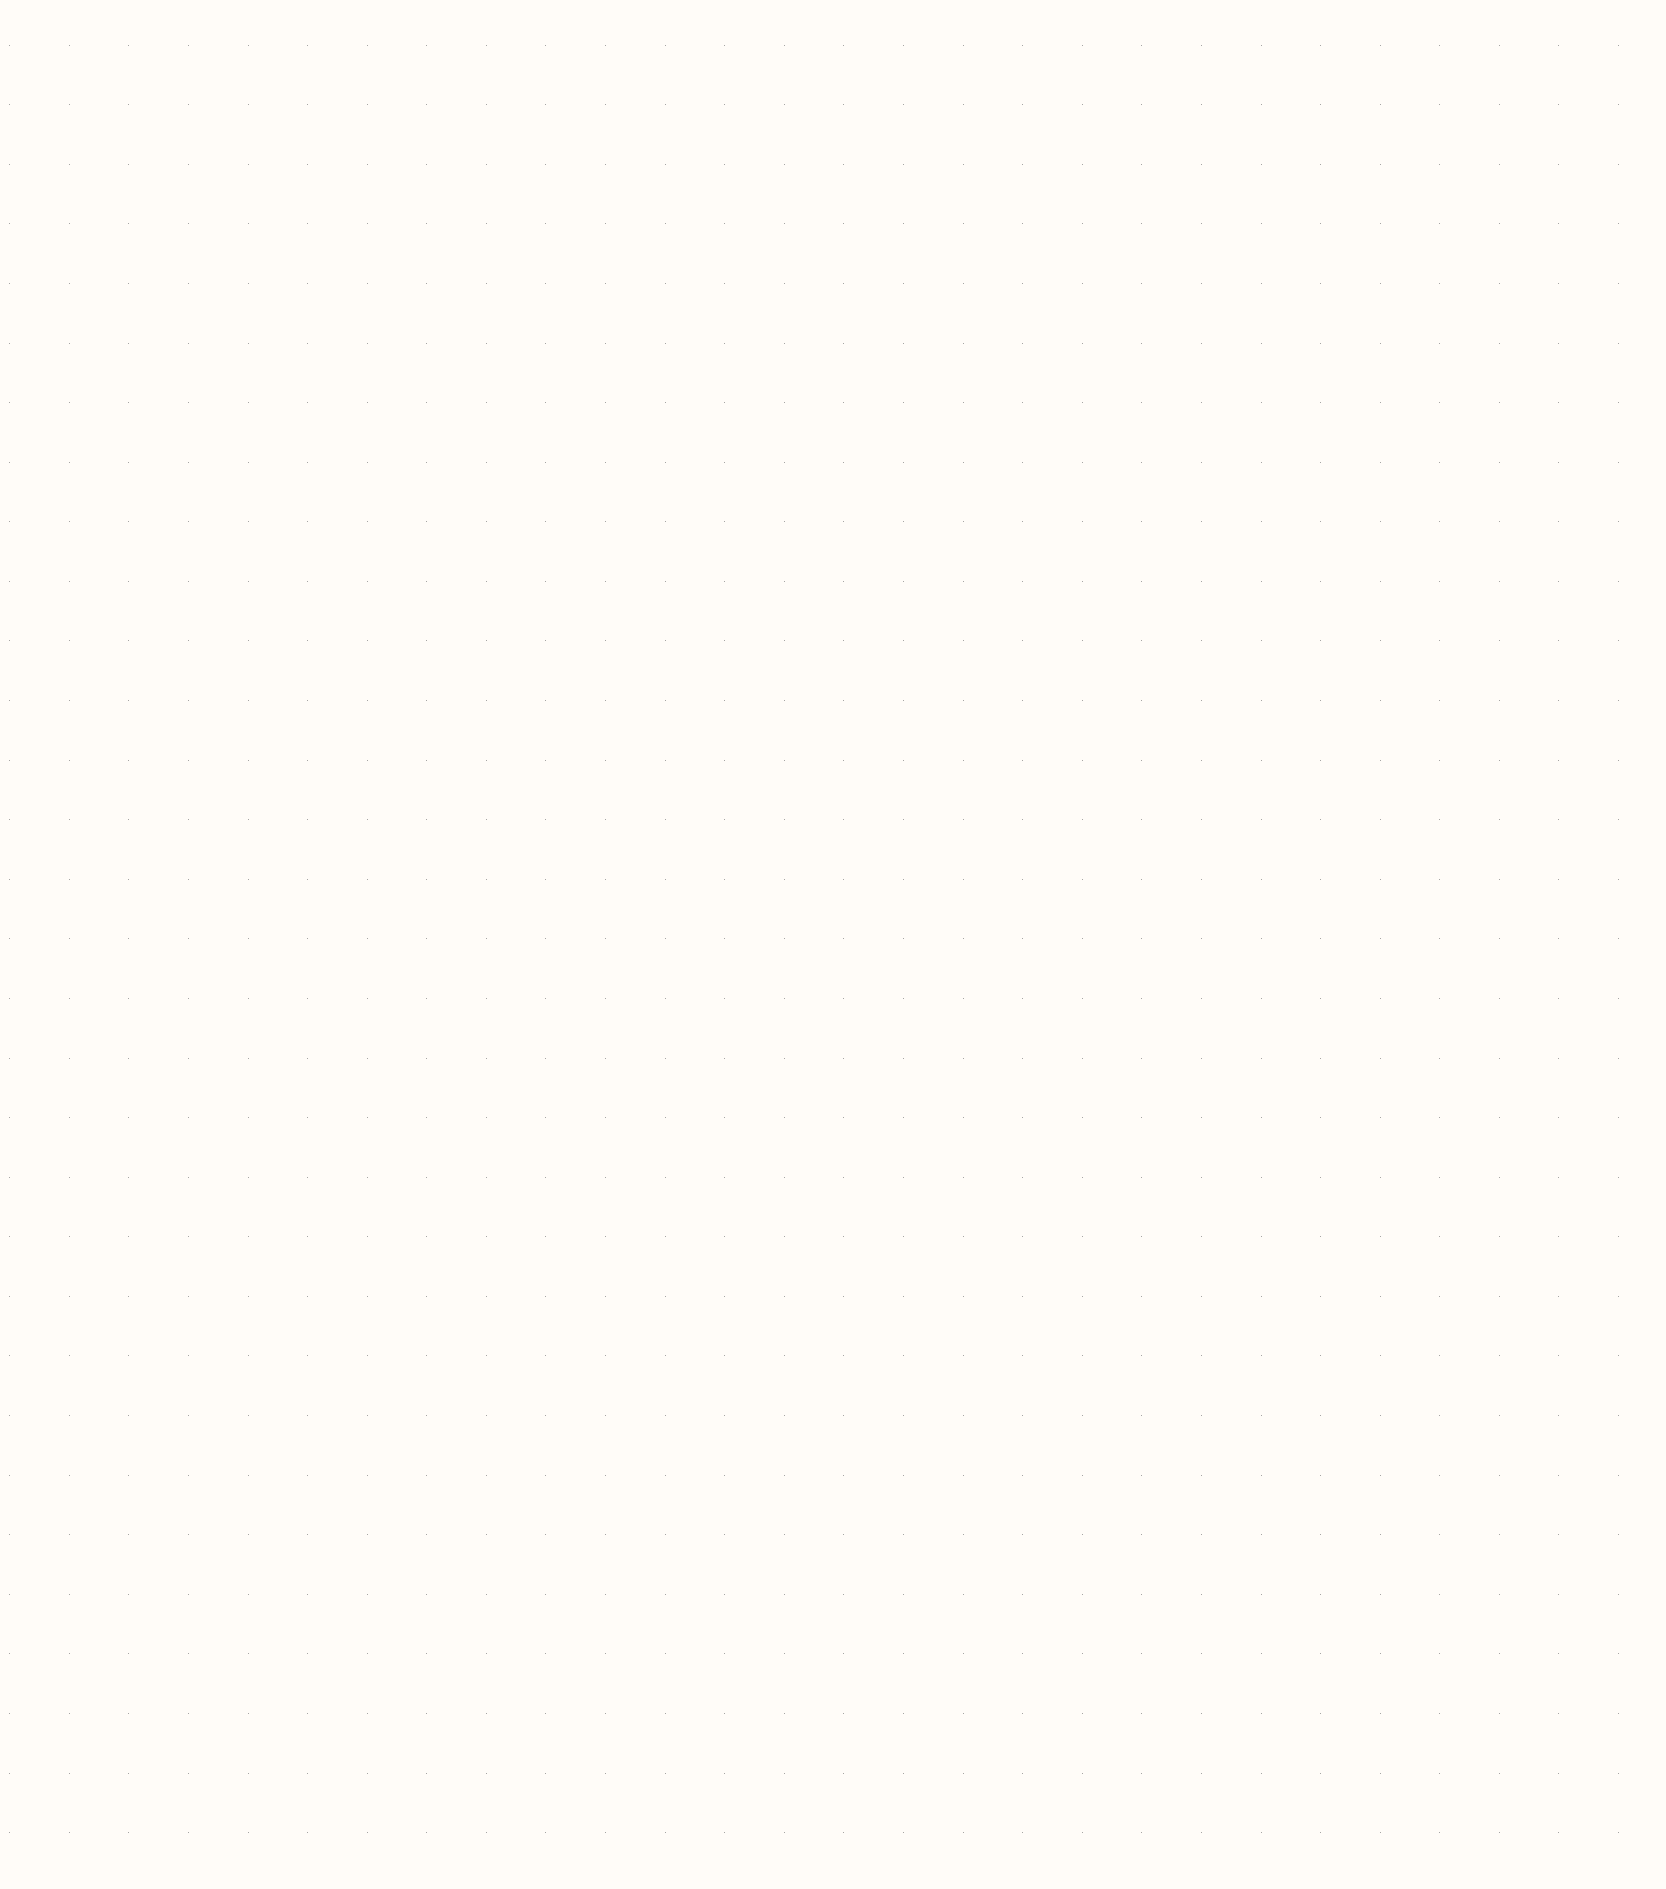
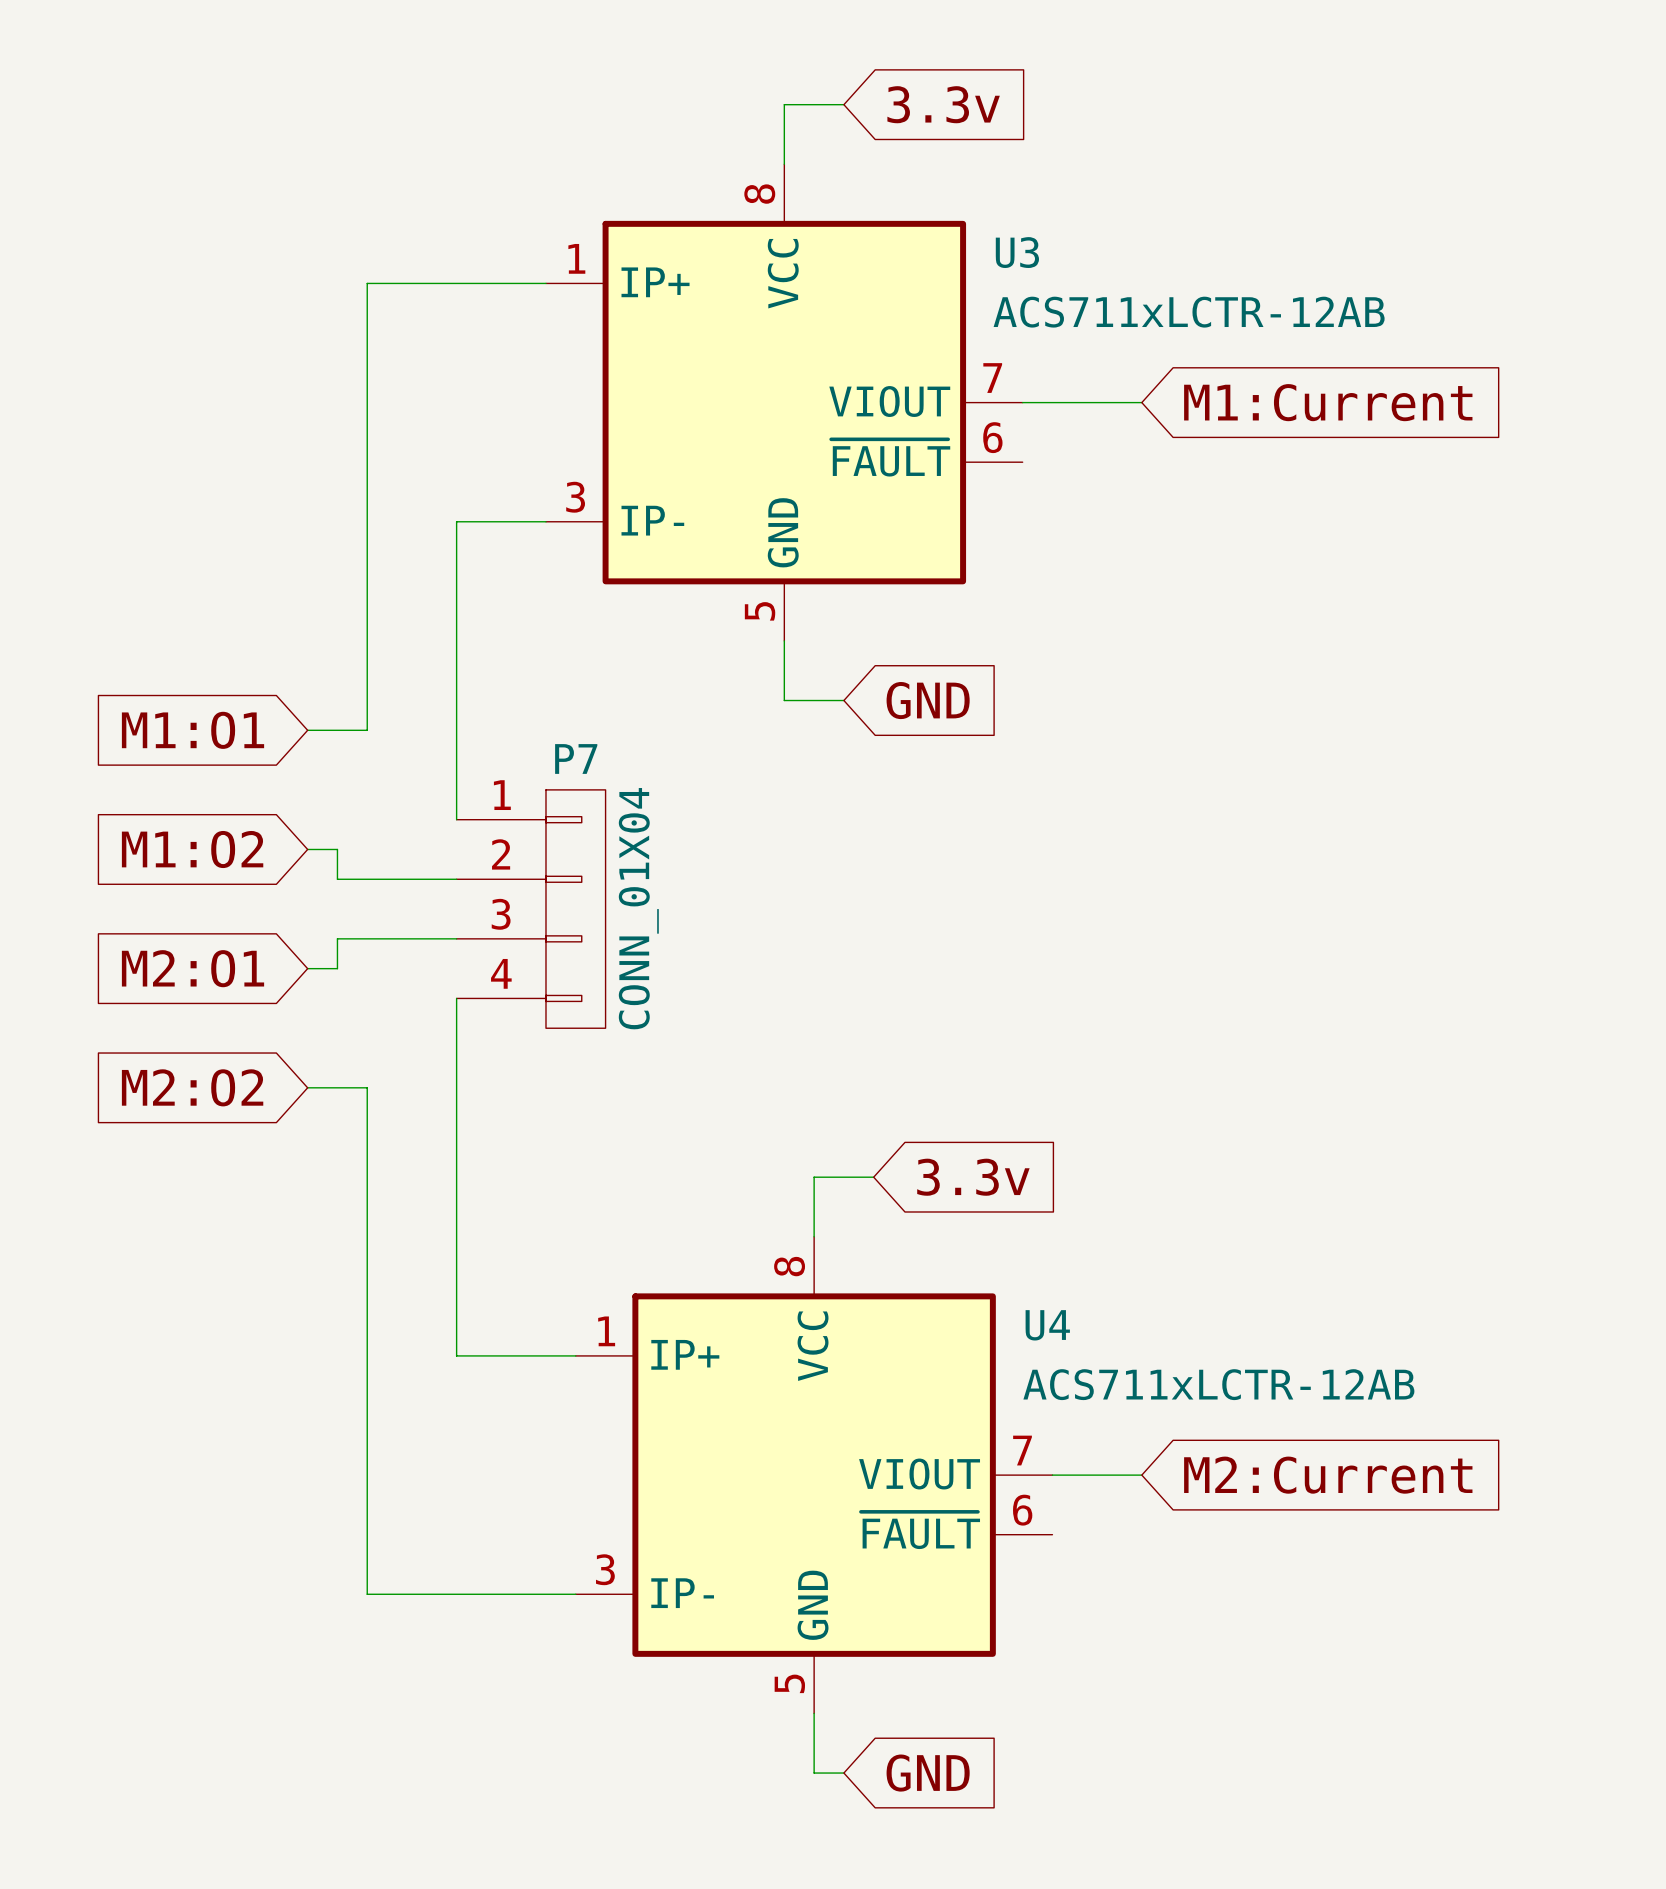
wire: none -> (843, 104) (784, 104) (784, 164)
global label: none -> 3.3v (943, 104)
wire: none -> (545, 283) (367, 283) (367, 730) (307, 730)
U3: none -> ACS711xLCTR-12AB (784, 402)
wire: none -> (1022, 402) (1141, 402)
global label: none -> M1:Current (1328, 402)
wire: none -> (545, 521) (456, 521) (456, 819)
wire: none -> (784, 640) (784, 700) (843, 700)
global label: none -> GND (928, 700)
global label: none -> M1:O1 (193, 730)
global label: none -> M1:O2 (192, 849)
wire: none -> (307, 849) (337, 849) (337, 879) (456, 879)
P7: none -> CONN_01X04 (531, 909)
wire: none -> (456, 938) (337, 938) (337, 968) (307, 968)
global label: none -> M2:O1 (193, 968)
wire: none -> (456, 998) (456, 1355) (575, 1355)
global label: none -> M2:O2 (192, 1087)
wire: none -> (307, 1087) (367, 1087) (367, 1594) (575, 1594)
wire: none -> (873, 1177) (814, 1177) (814, 1236)
global label: none -> 3.3v (973, 1177)
U4: none -> ACS711xLCTR-12AB (814, 1475)
wire: none -> (1052, 1475) (1141, 1475)
global label: none -> M2:Current (1328, 1475)
wire: none -> (814, 1713) (814, 1773) (843, 1773)
global label: none -> GND (928, 1773)

